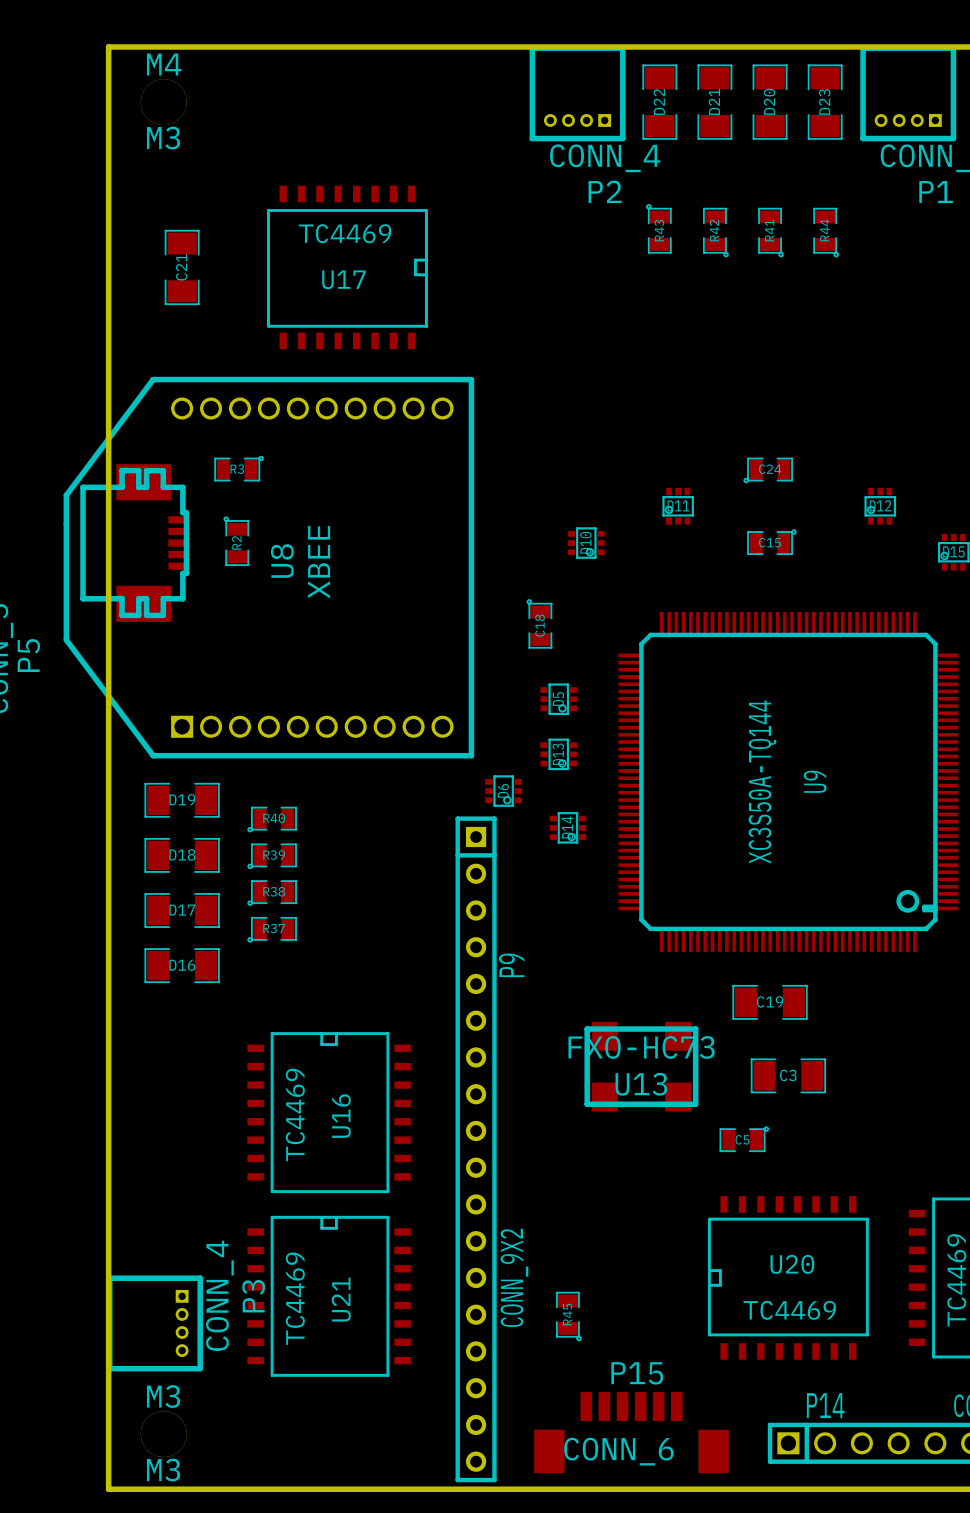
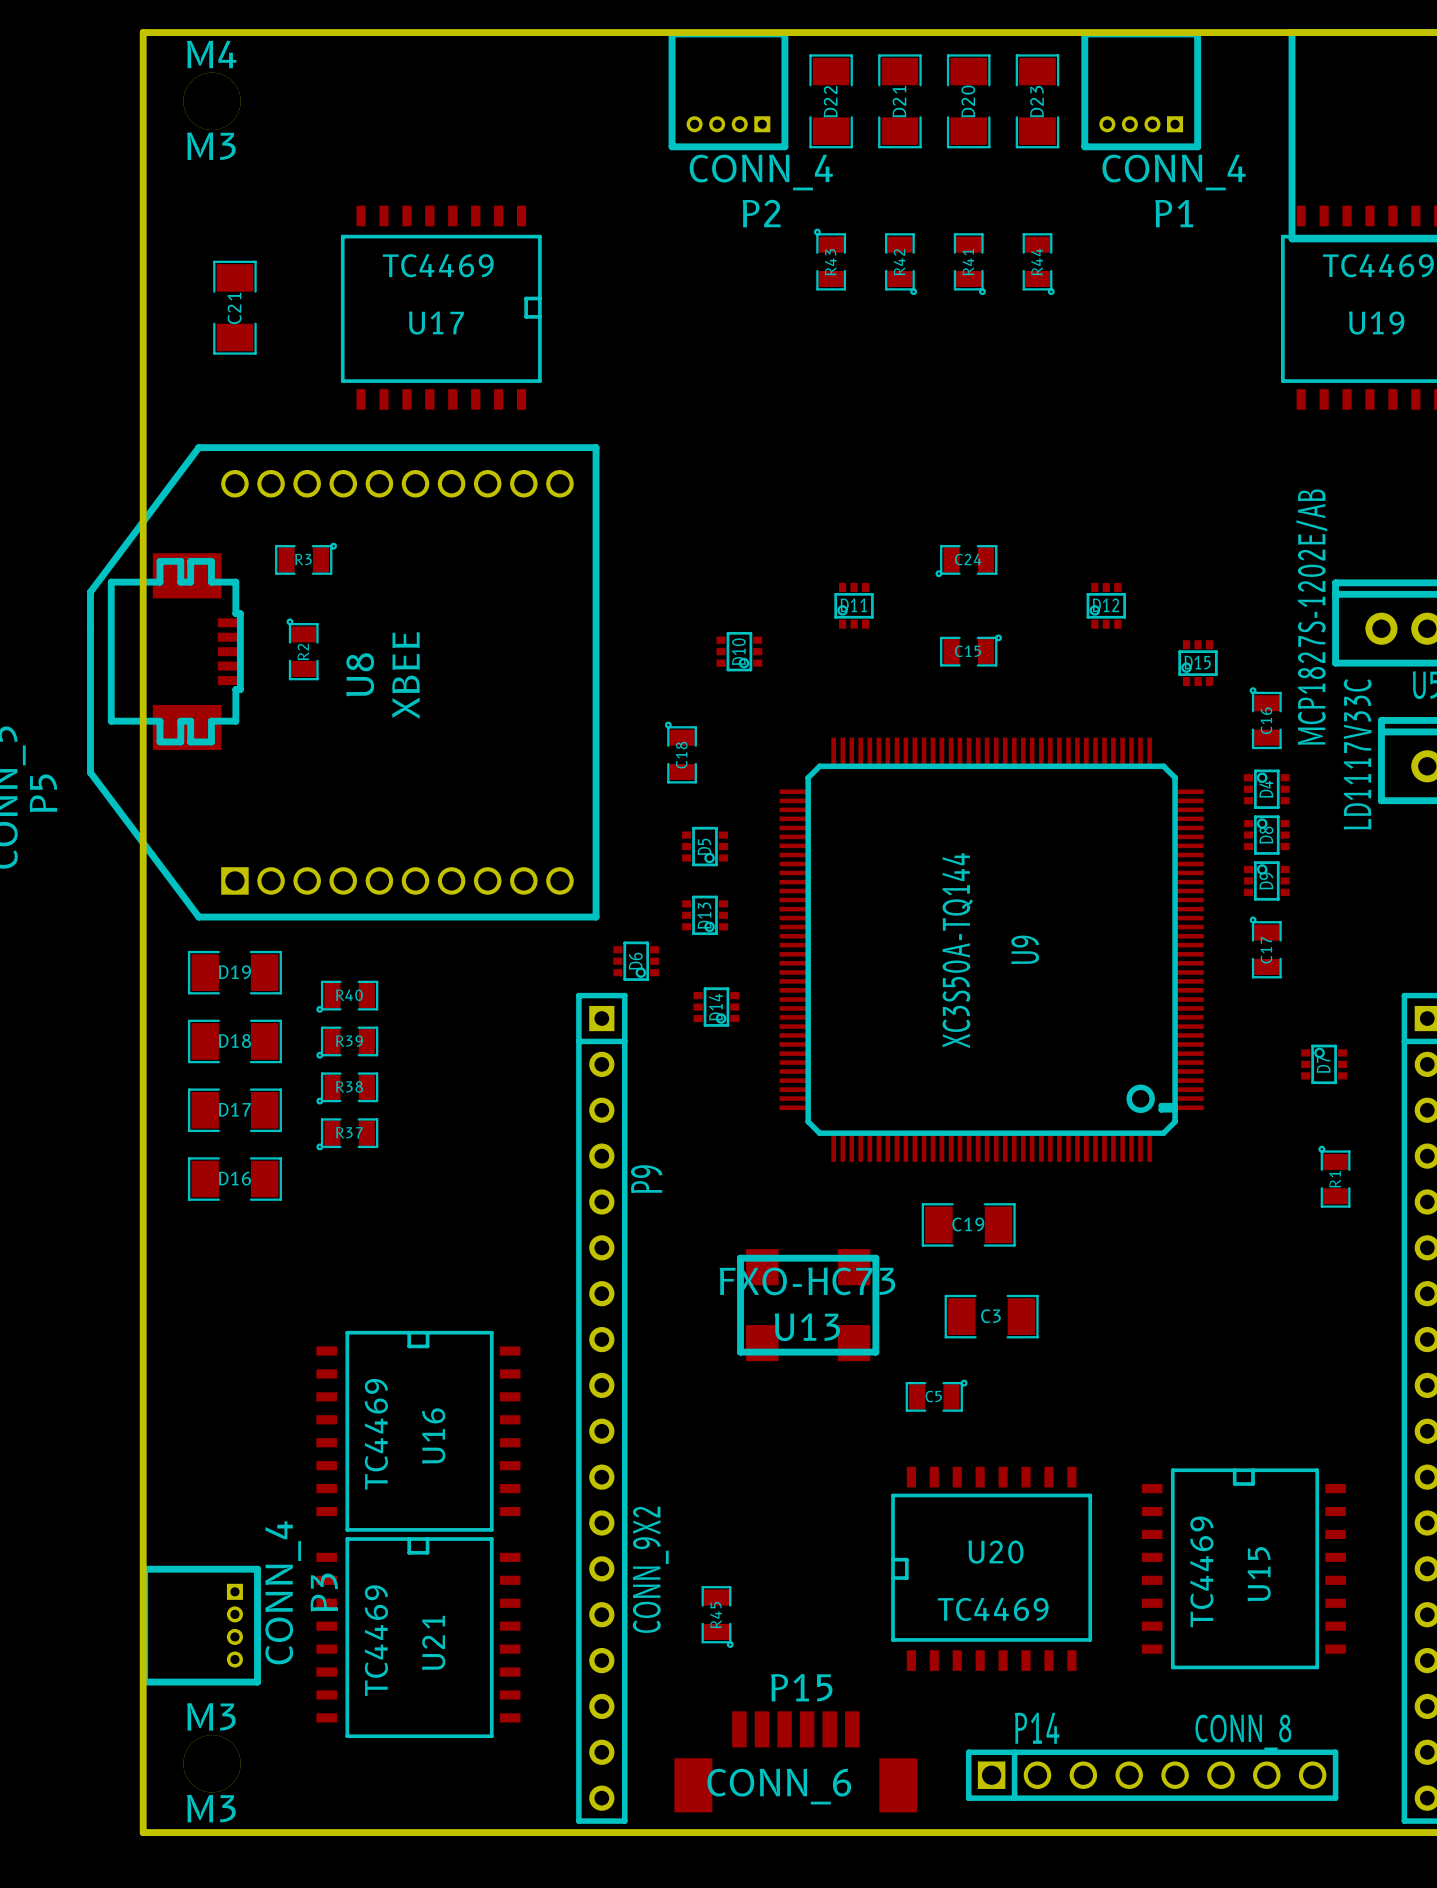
U16 position: (329, 1112) -> (418, 1431)
U21 position: (329, 1296) -> (418, 1637)

